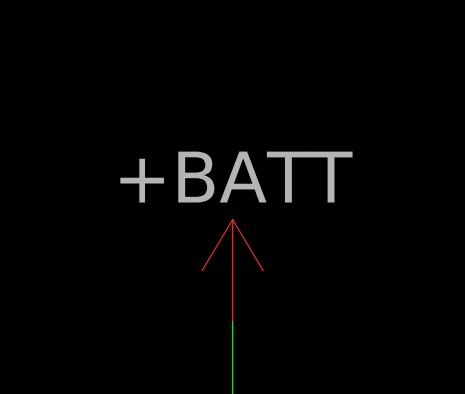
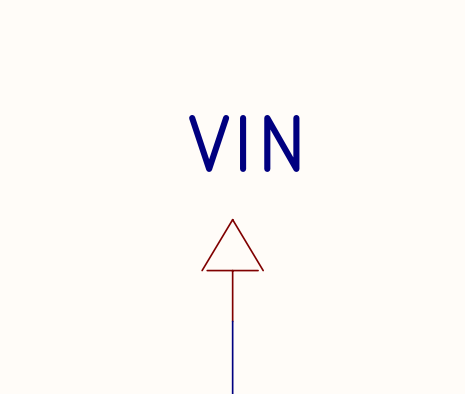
power symbol: +BATT (232, 270) -> VIN (232, 270)

